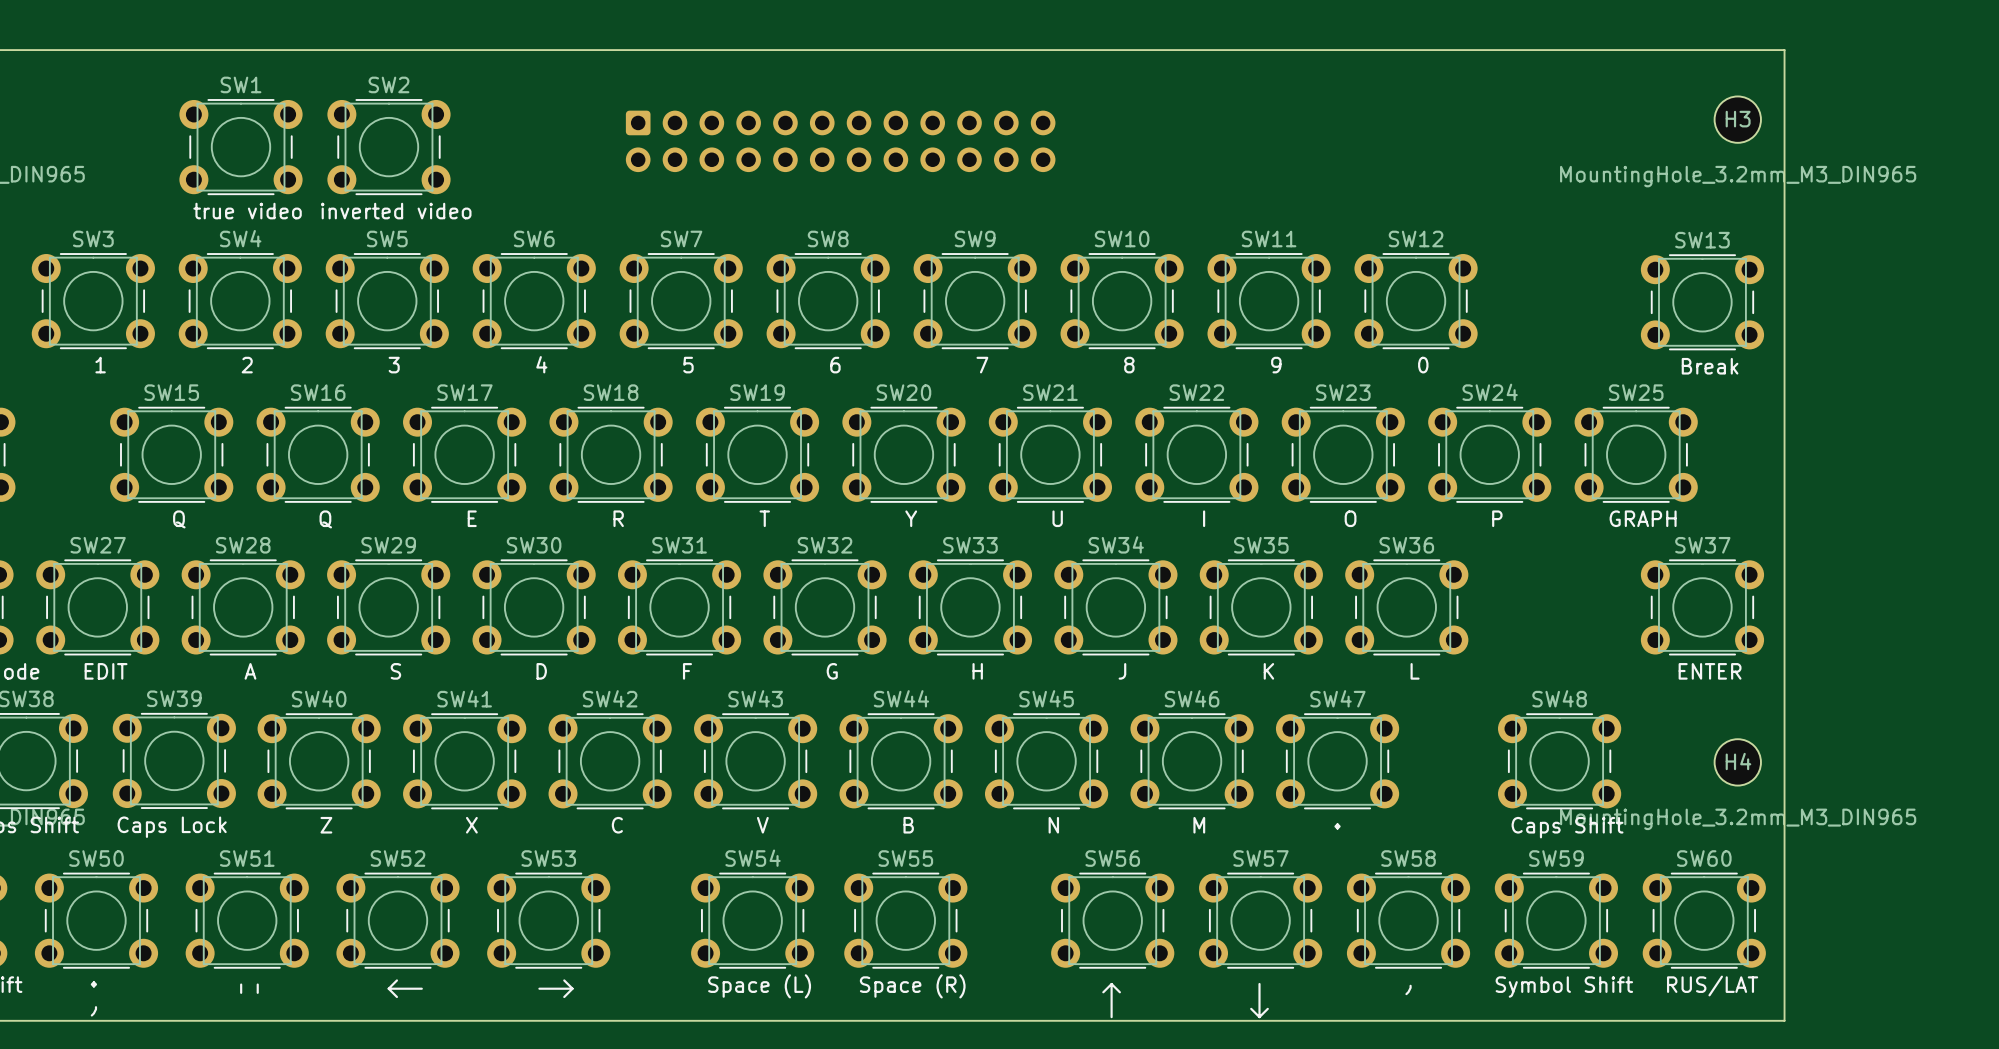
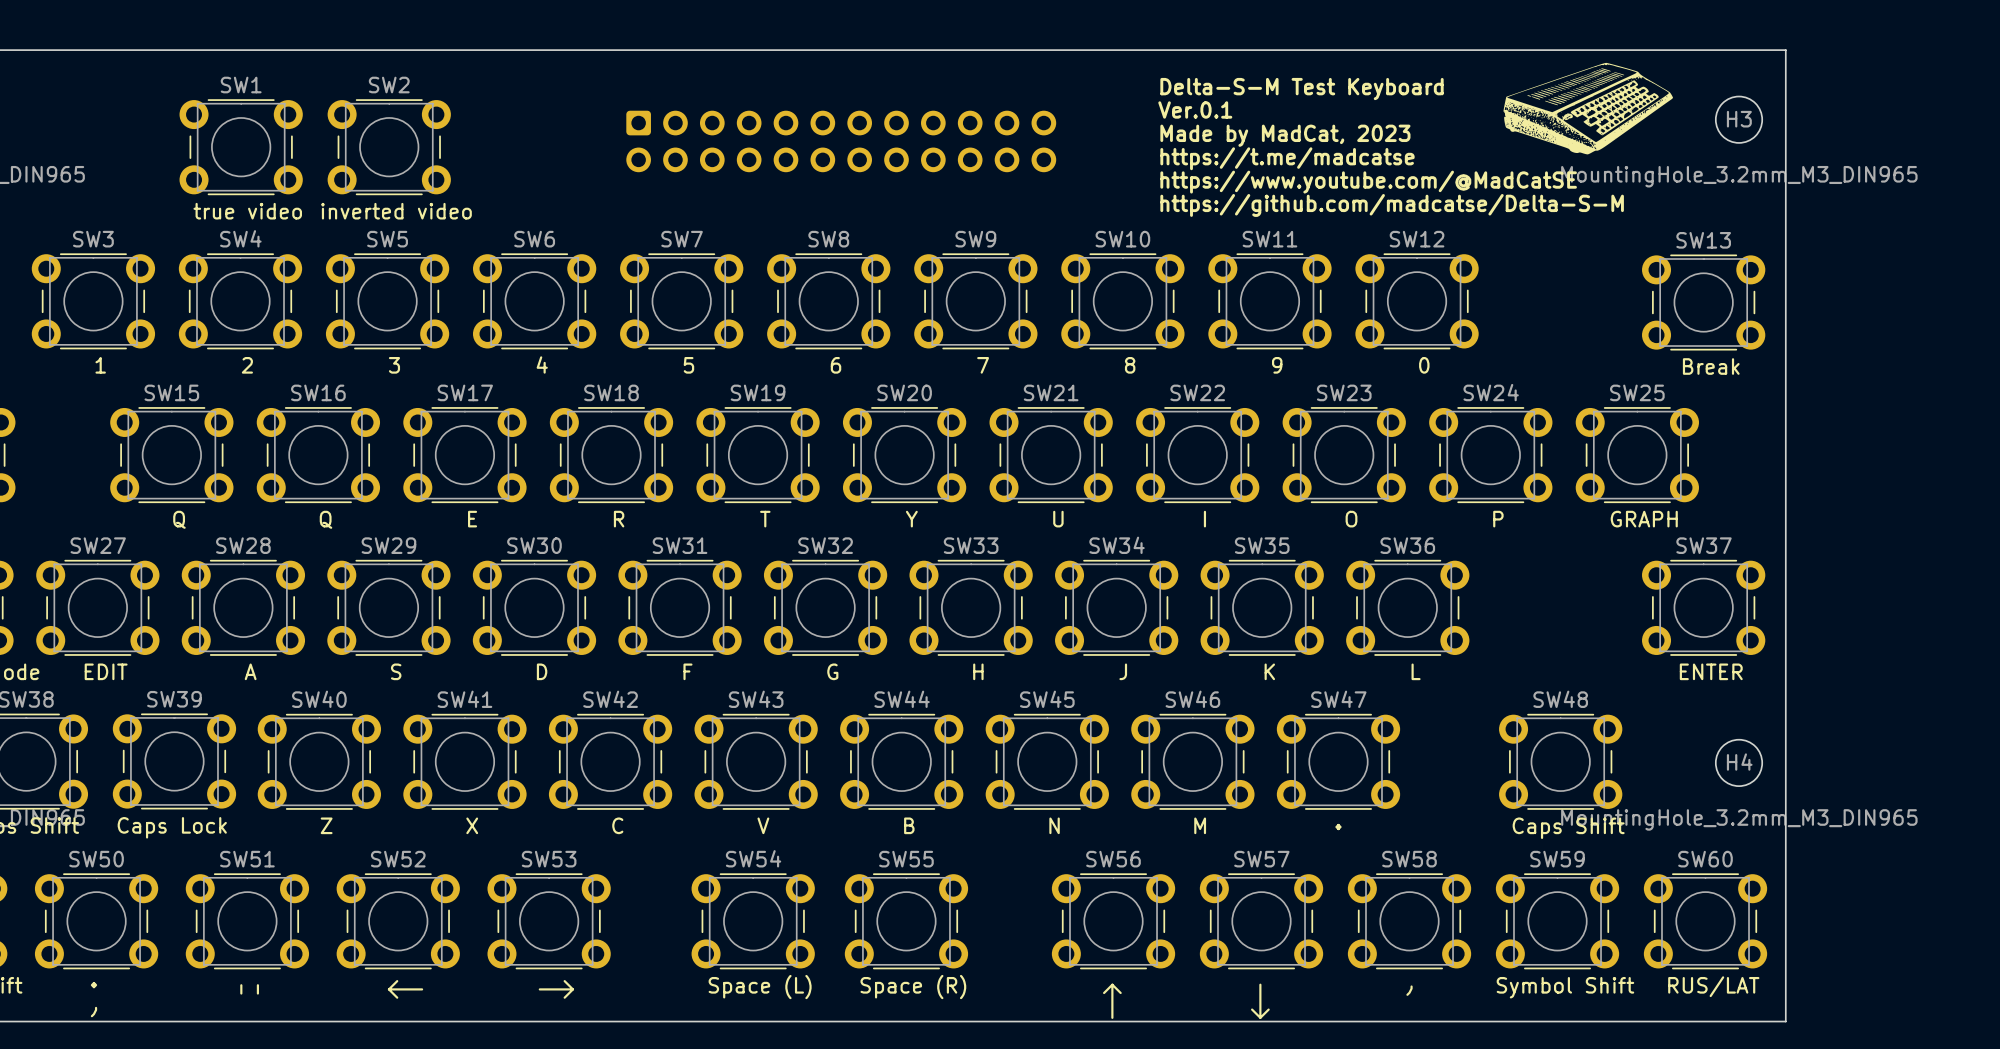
drawing: none -> [1503, 62, 1673, 155]
text: none -> Delta-S-M Test Keyboard (1302, 89)
text: none -> Ver.0.1 (1195, 109)
text: none -> Made by MadCat, 2023 (1285, 135)
text: none -> https://t.me/madcatse (1287, 158)
text: none -> https://www.youtube.com/@MadCatSE (1368, 182)
text: none -> https://github.com/madcatse/Delta-S-M (1392, 205)

